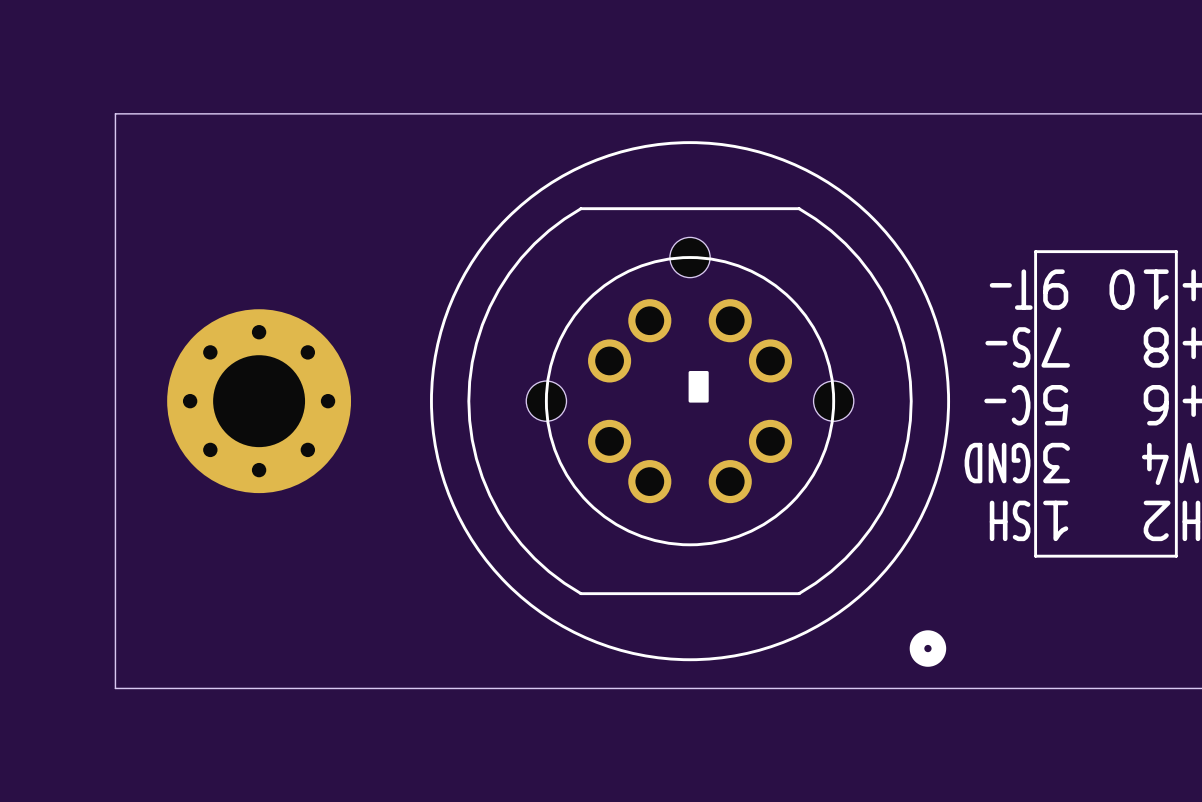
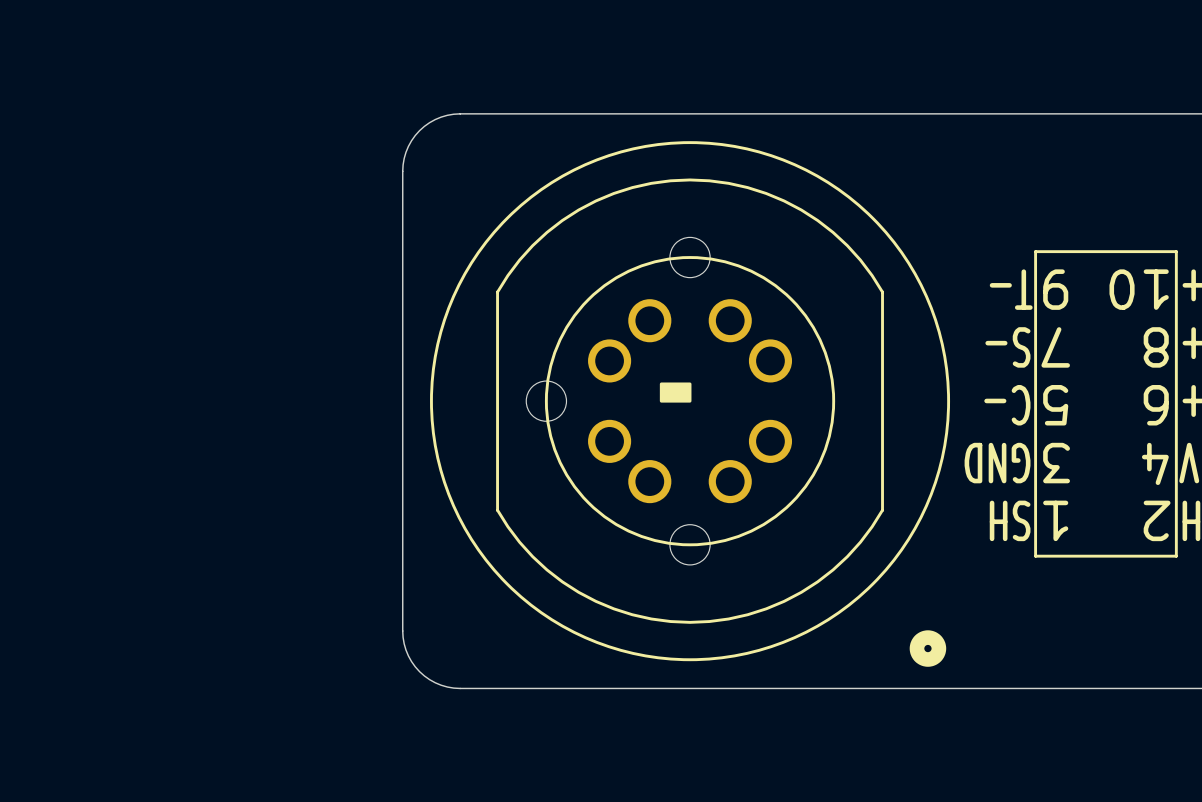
board edge: (460, 113) (115, 113) (115, 688) (460, 688) -> (460, 113) (435, 119) (419, 130) (405, 152) (402, 171) (403, 637) (408, 655) (424, 675) (441, 685) (460, 688)
part: (259, 401) -> none
part rotation: 0° (690, 401) -> 90° counterclockwise (690, 401)

